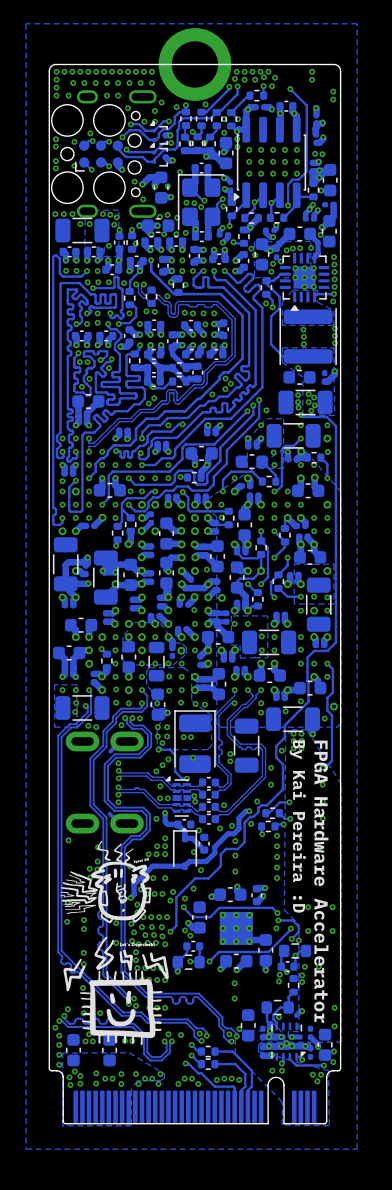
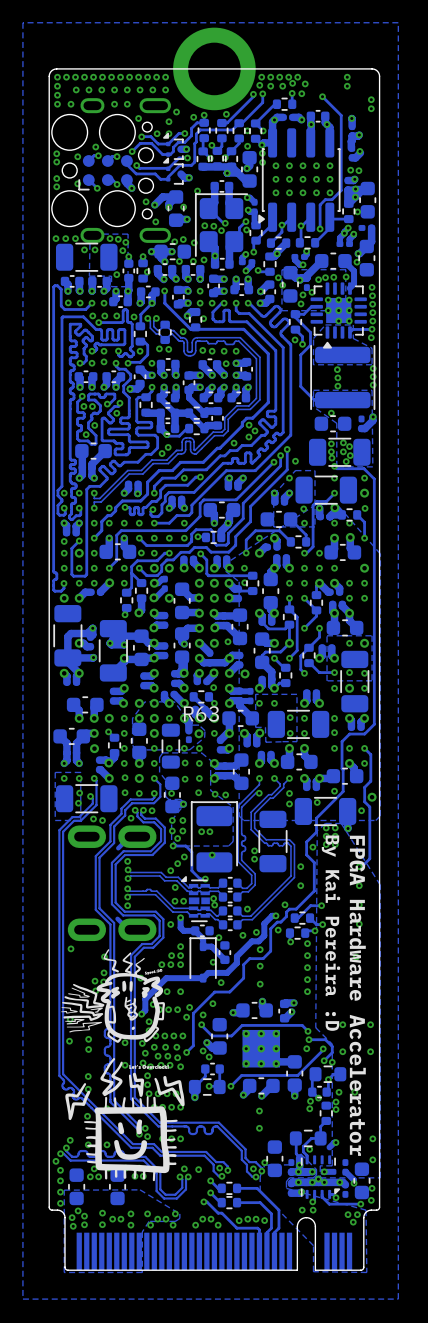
track: none -> (193, 696) (204, 709)
R63: none -> (201, 696)

